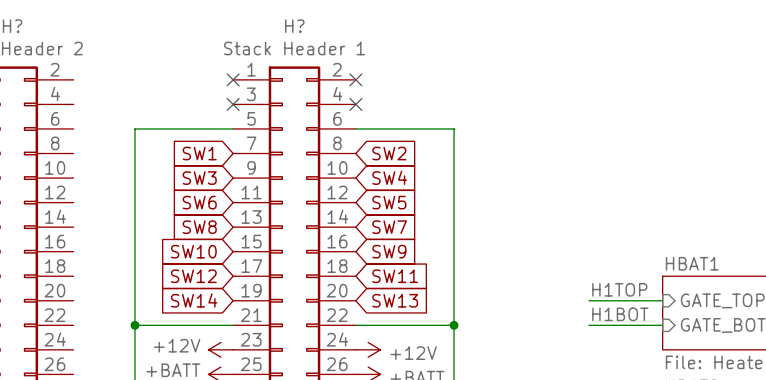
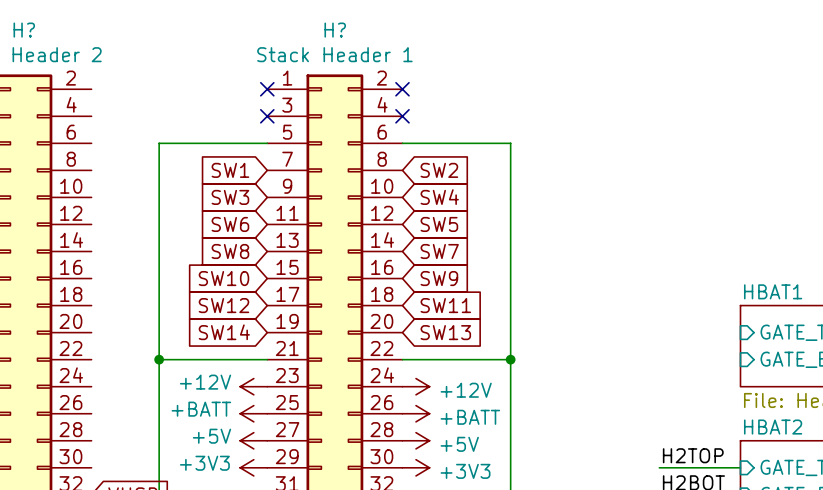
label: H1TOP (619, 289) -> none
wire: (589, 300) (662, 300) -> none
label: H1BOT (620, 314) -> none
wire: (589, 325) (662, 325) -> none

